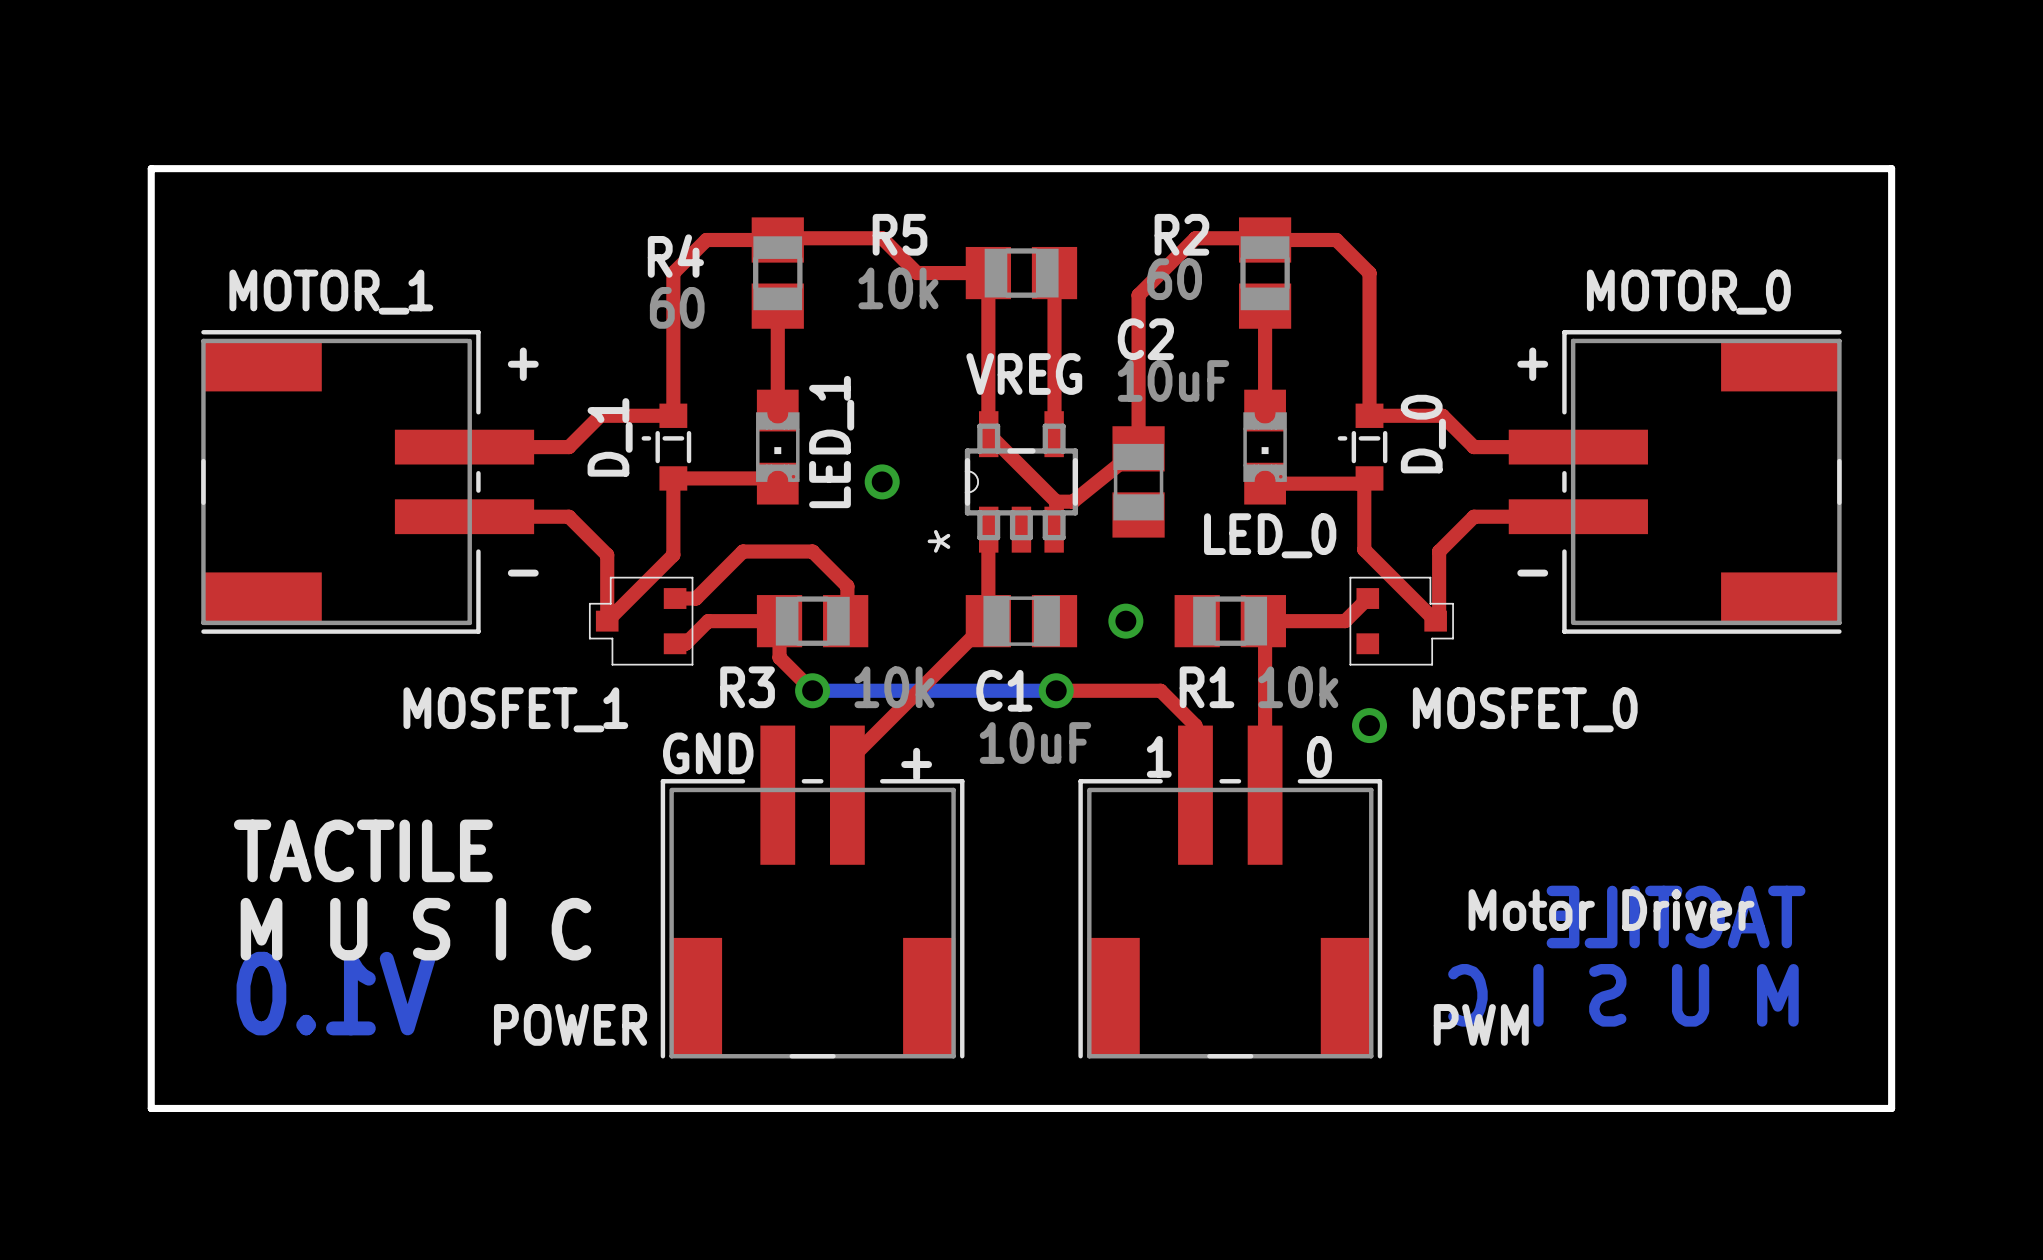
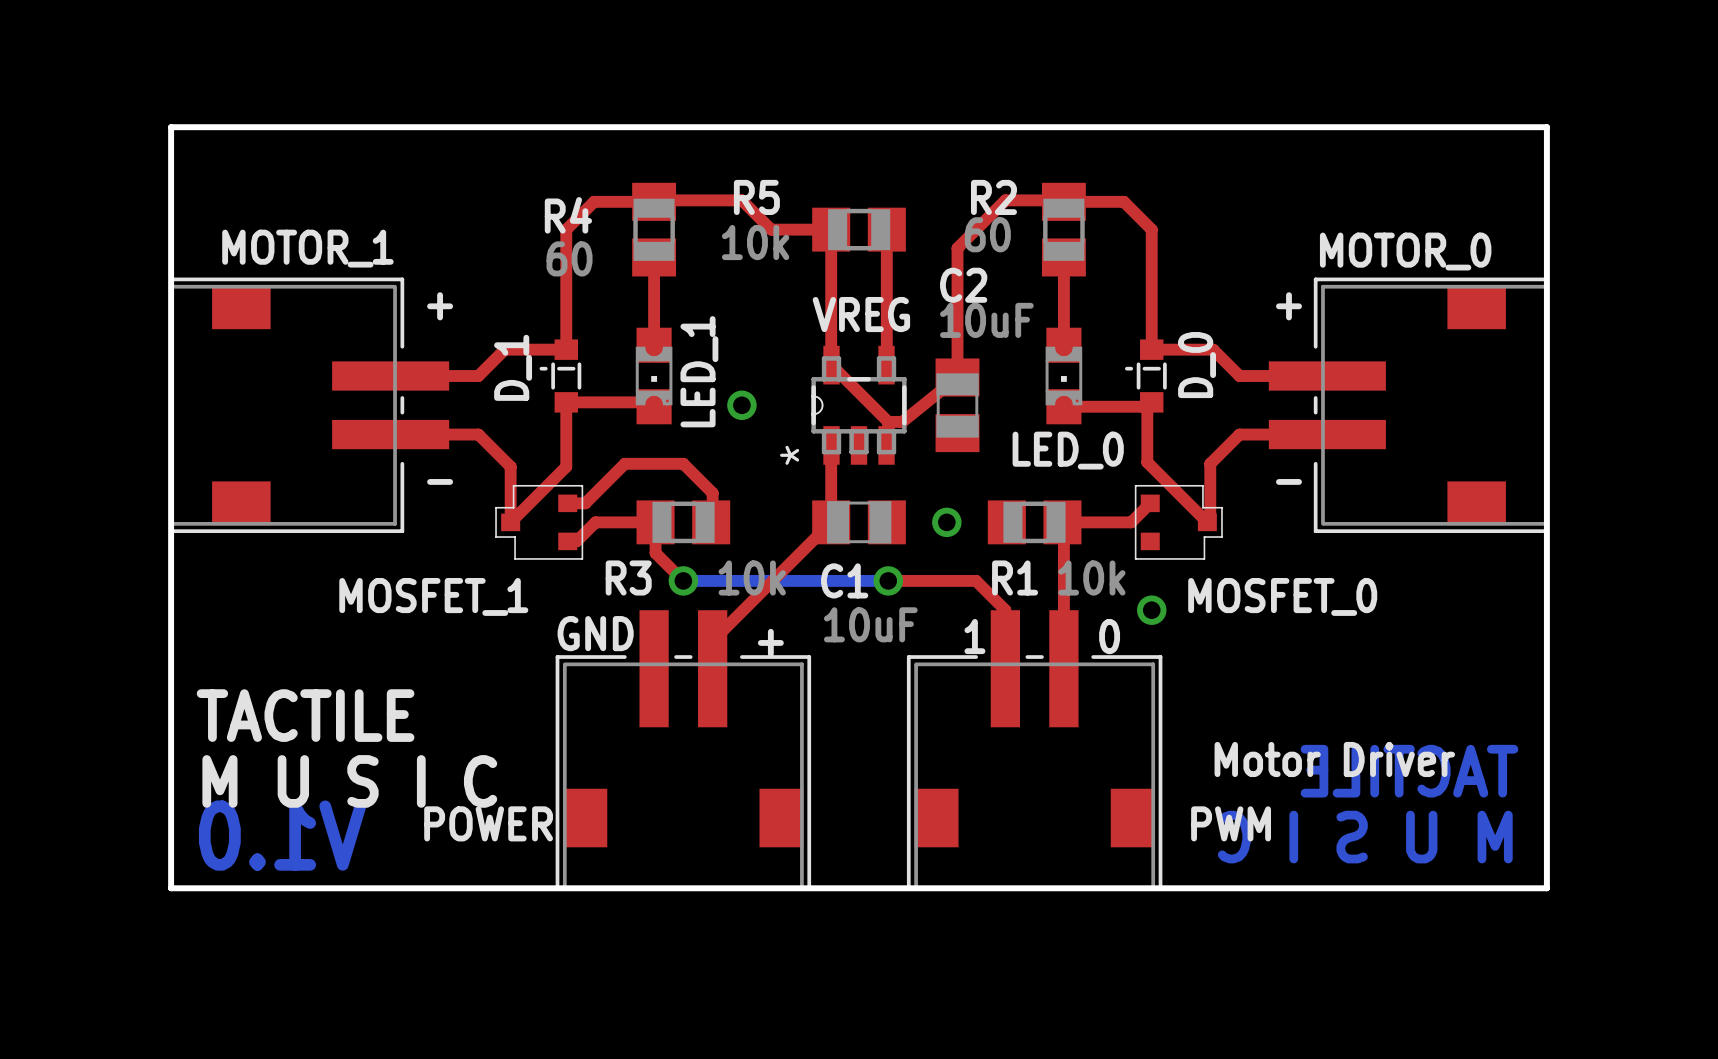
board edge: (151, 168) (151, 1108) (1891, 1108) (1891, 168) (151, 168) -> (171, 127) (171, 888) (1546, 888) (1546, 127) (171, 127)
MOTOR_1 footprint: [201, 330, 535, 634] -> [169, 277, 450, 534]
MOTOR_0 footprint: [1508, 330, 1842, 634] -> [1268, 277, 1549, 534]
POWER footprint: [660, 725, 965, 1059] -> [555, 610, 812, 891]
PWM footprint: [1078, 725, 1383, 1059] -> [906, 610, 1163, 891]
text position: Motor Driver (1611, 910) -> Motor Driver (1334, 759)

